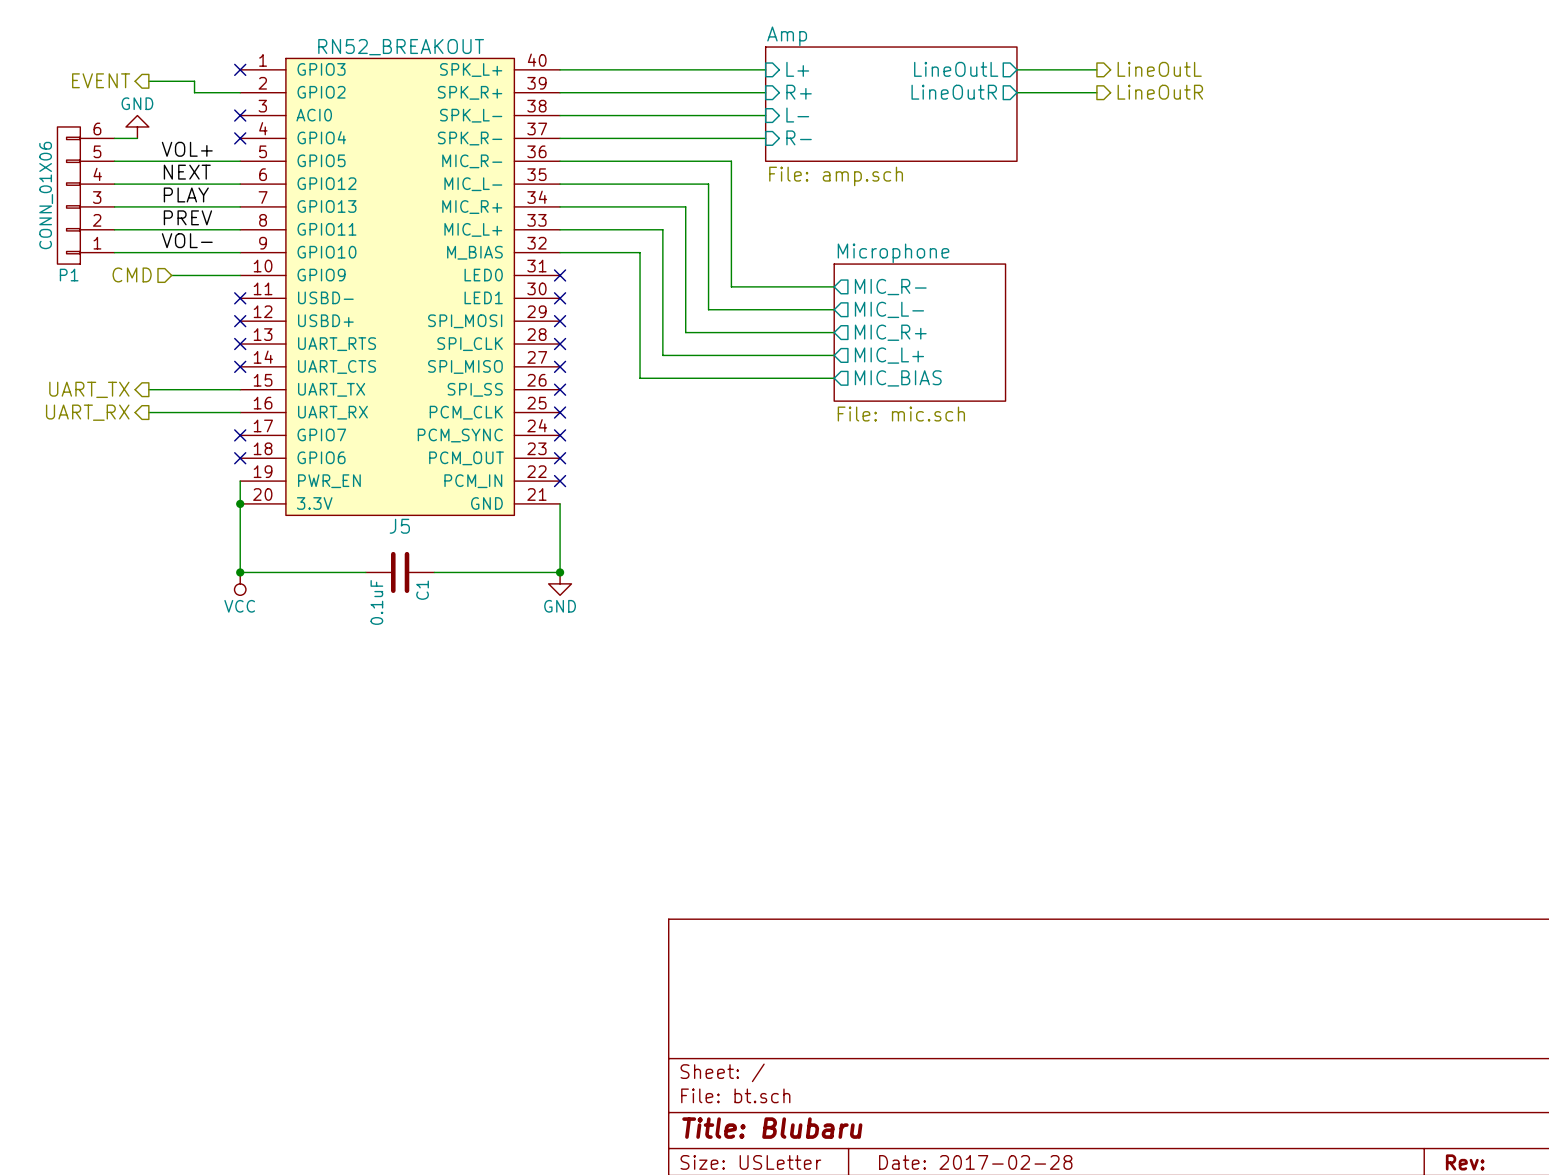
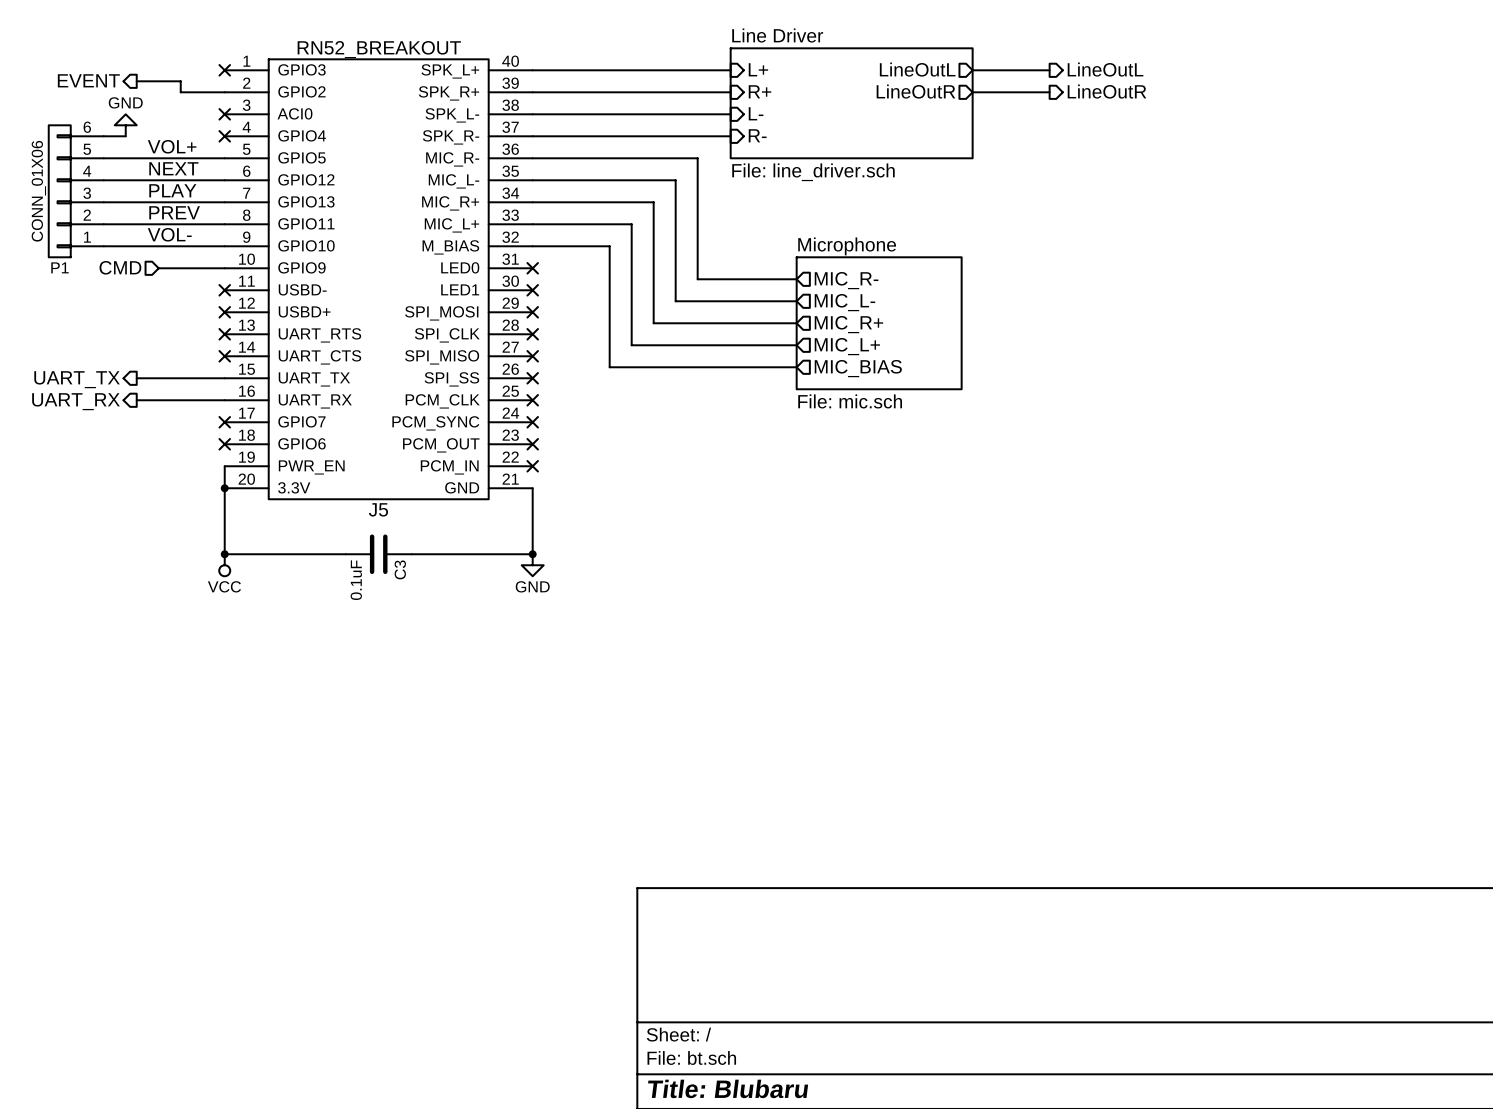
sheet Amp name: Amp (787, 36) -> Line Driver (777, 35)
sheet Amp value: File: amp.sch (836, 176) -> File: line_driver.sch (813, 172)
C1 name: C1 (422, 590) -> C3 (400, 569)

